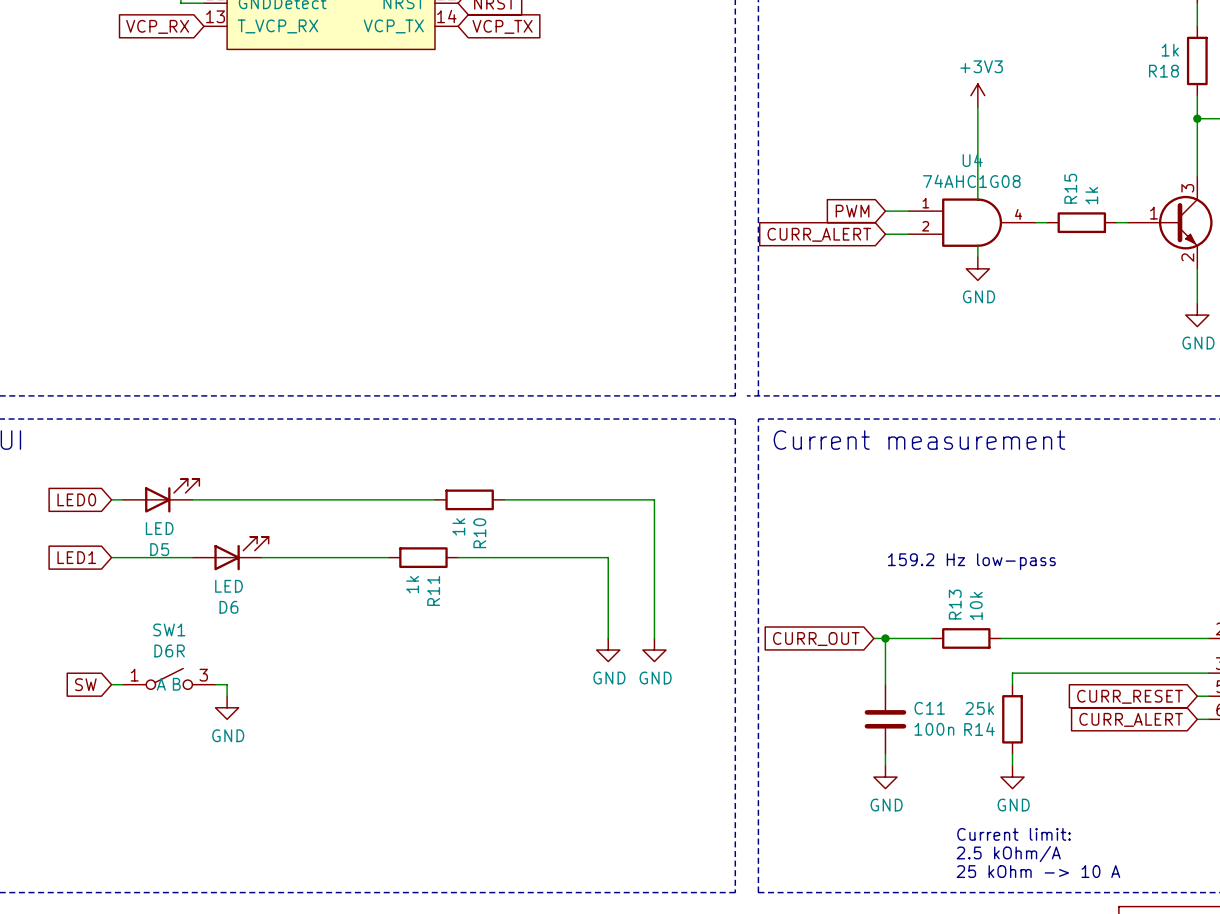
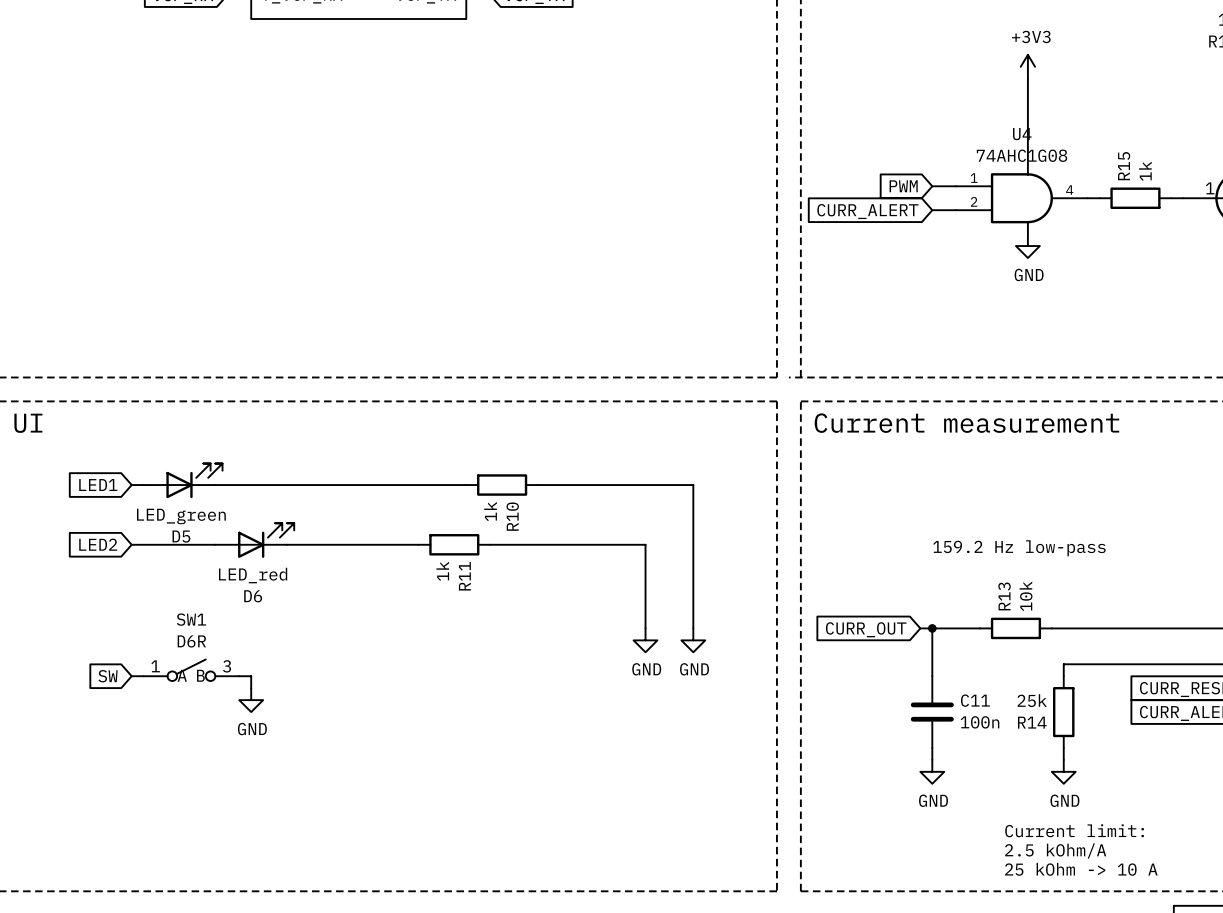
global label: LED0 (76, 499) -> LED1 (98, 485)
D5 value: LED (159, 528) -> LED_green (181, 516)
global label: LED1 (76, 557) -> LED2 (98, 544)
D6 value: LED (228, 586) -> LED_red (253, 575)

